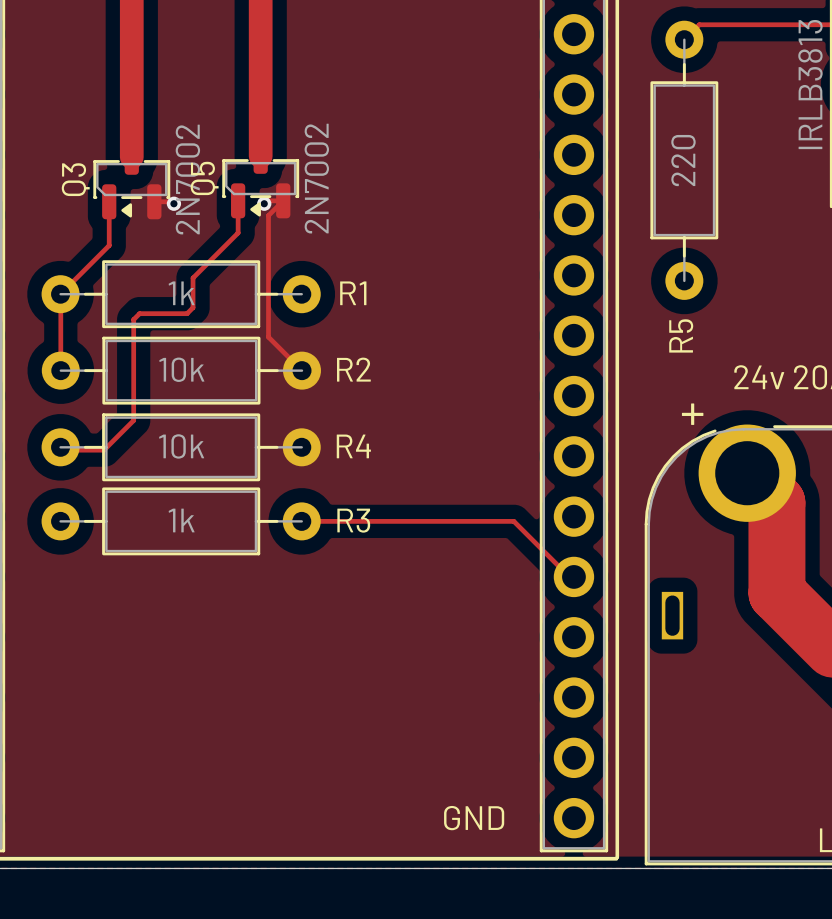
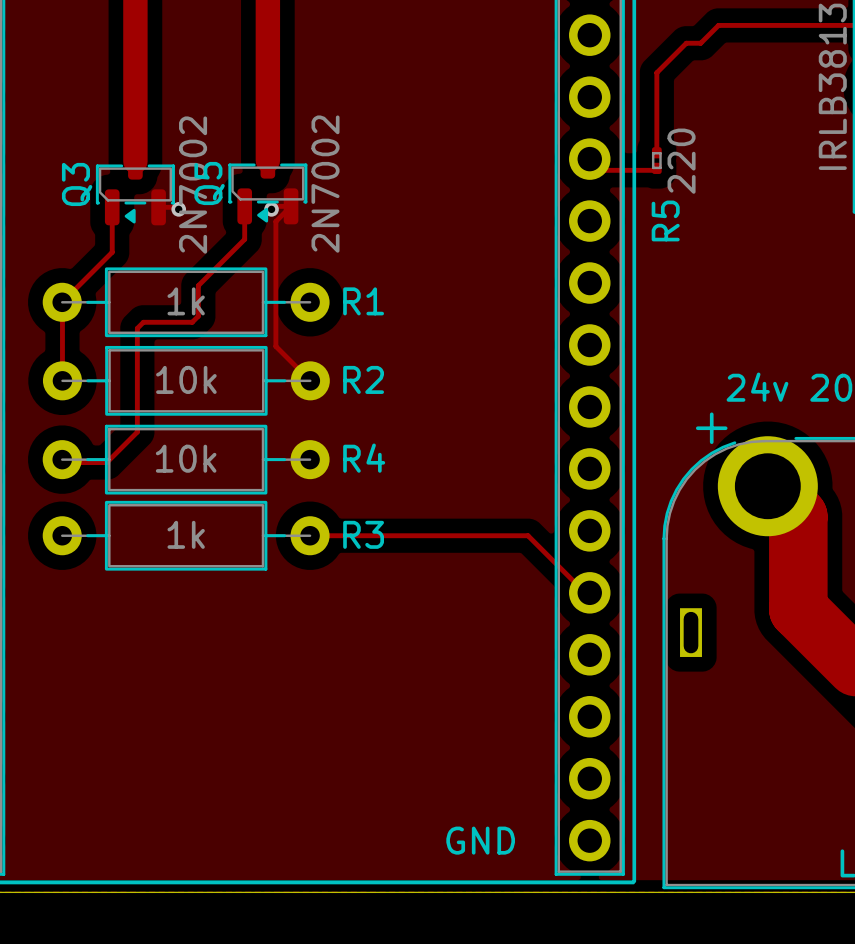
R5 footprint: [650, 20, 719, 300] -> [651, 147, 662, 174]
track: none -> (703, 40) (700, 43) (686, 43) (656, 72) (656, 152)
track: none -> (589, 159) (600, 170) (654, 170) (656, 168)
R5 name position: R5 (681, 335) -> R5 (665, 220)

